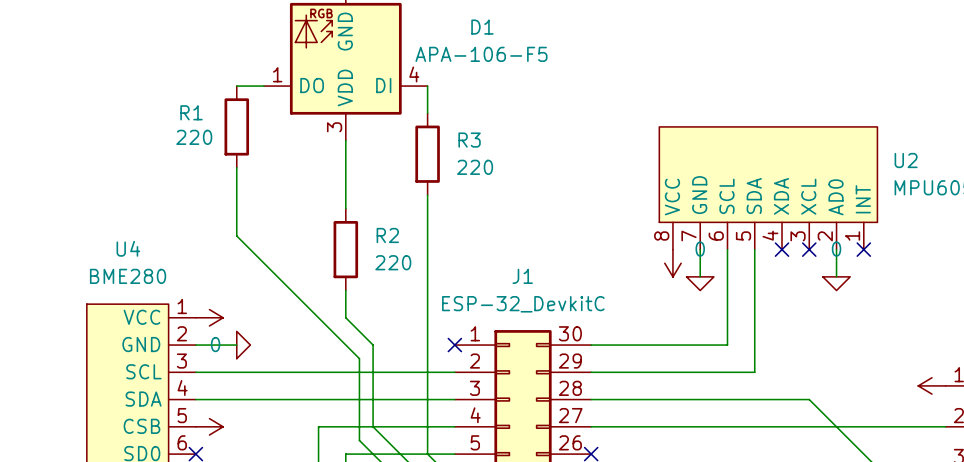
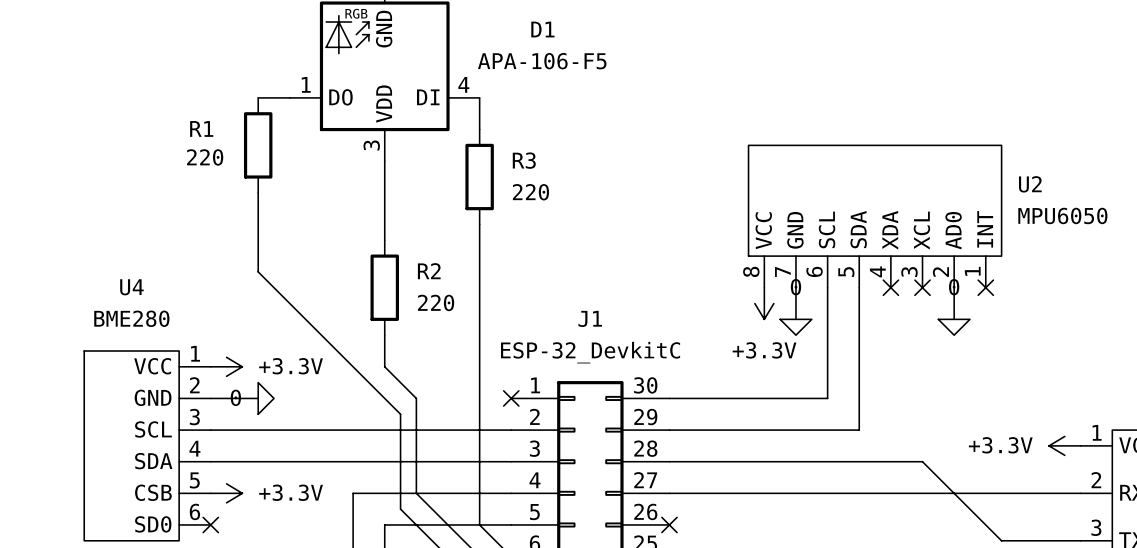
power symbol text: none -> +3.3V (764, 350)
power symbol text: none -> +3.3V (291, 366)
power symbol text: none -> +3.3V (1000, 445)
power symbol text: none -> +3.3V (291, 492)

